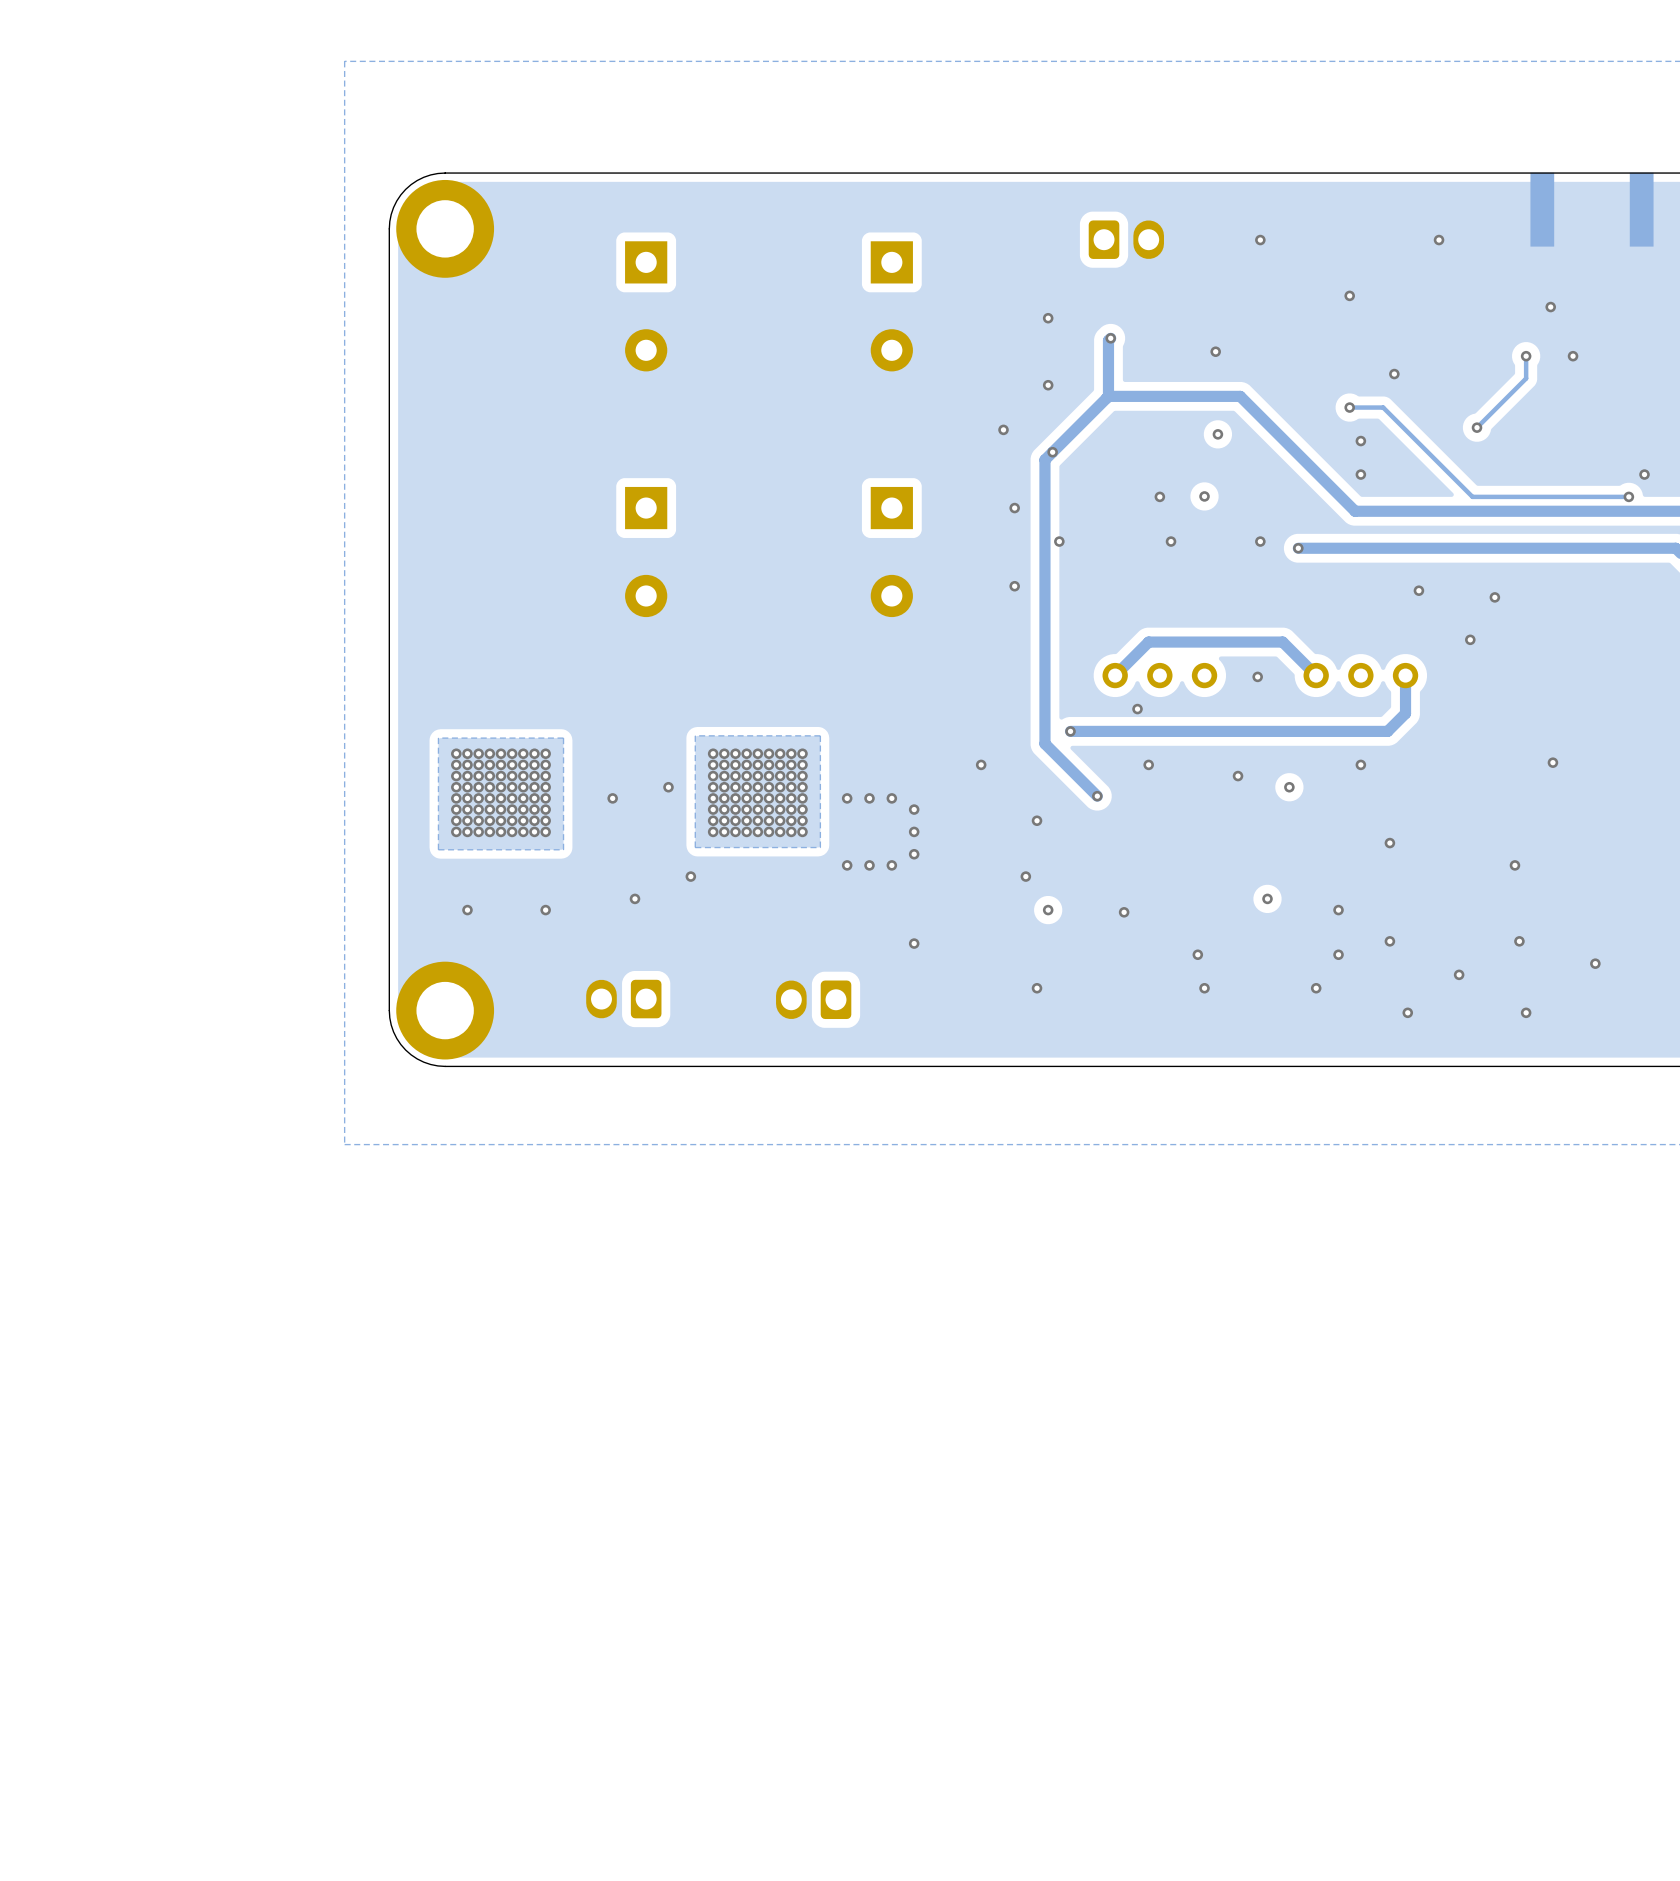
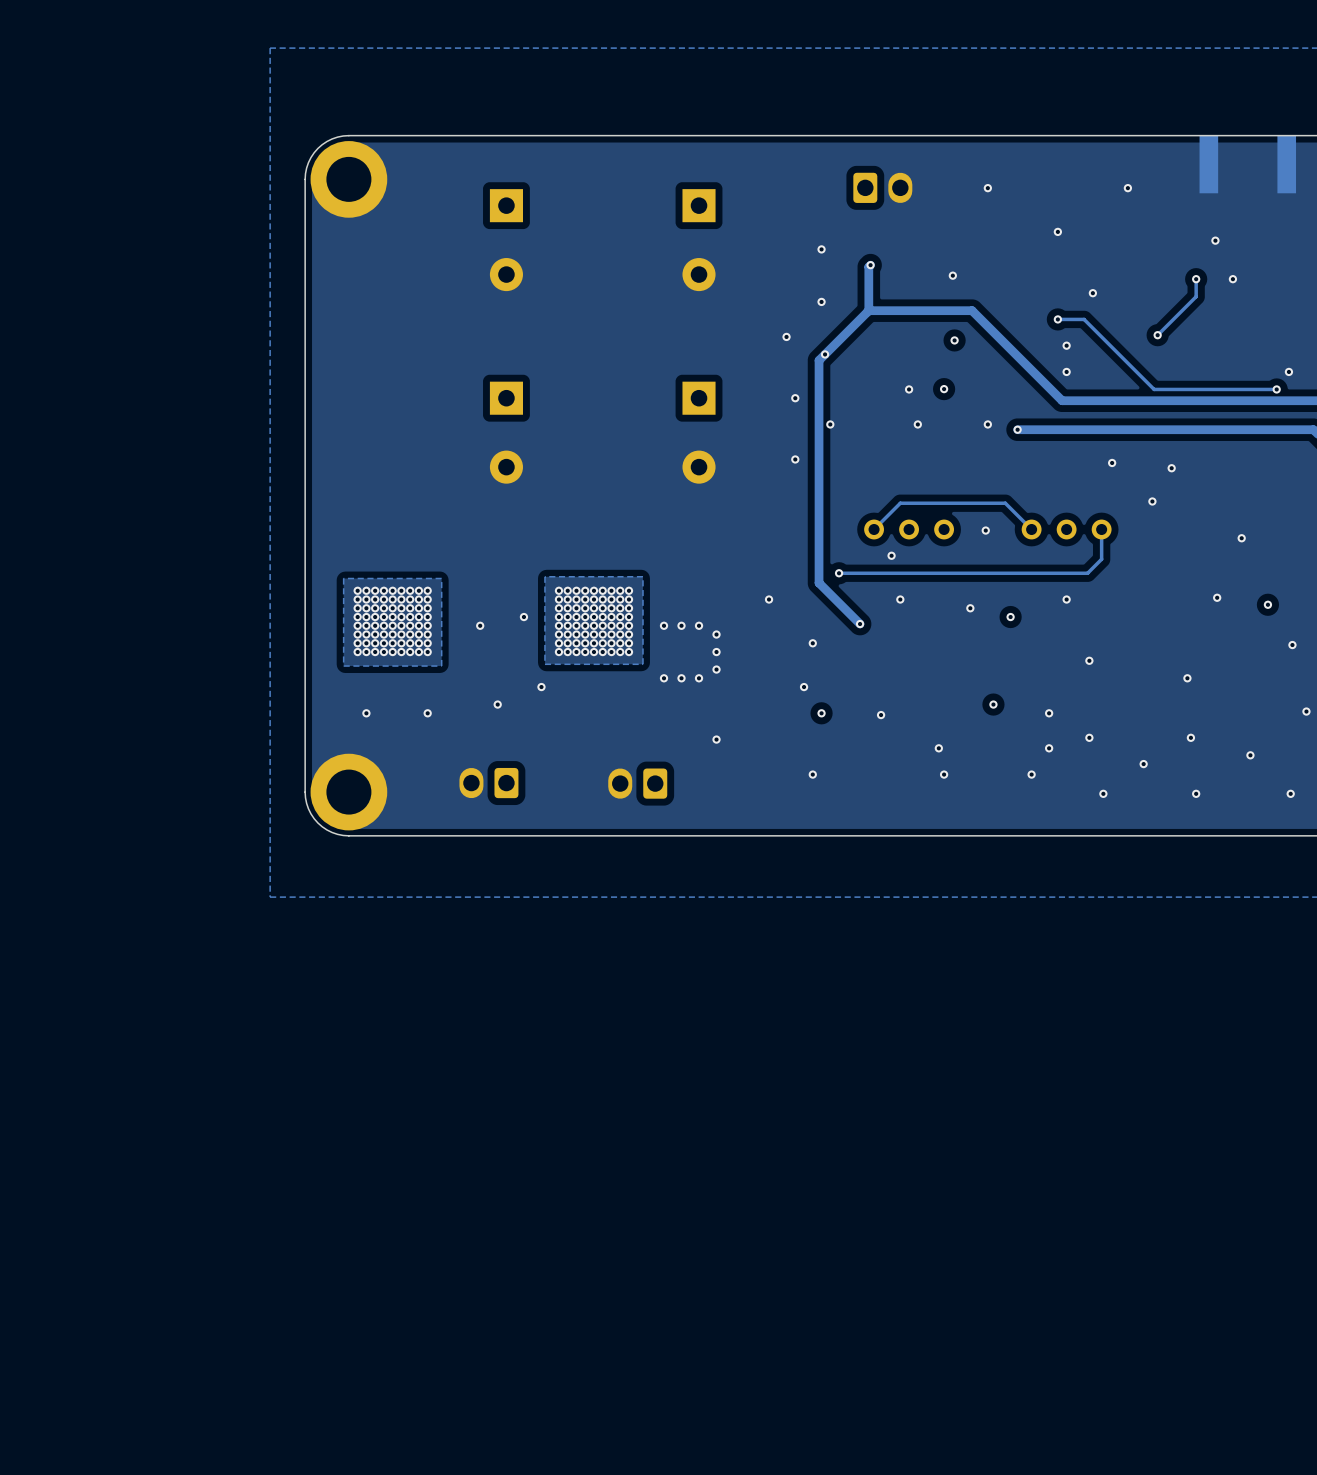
track width: thick (1316, 675) (1282, 642) (1148, 642) (1115, 675) -> thin (1031, 529) (1005, 503) (900, 503) (874, 529)
track width: thick (1405, 675) (1405, 713) (1387, 731) (1070, 731) -> thin (1101, 529) (1101, 559) (1087, 573) (839, 573)
via: none -> (1241, 538)
via: none -> (1267, 604)
via: none -> (1292, 645)
via: none -> (1306, 711)
via: none -> (1290, 793)

